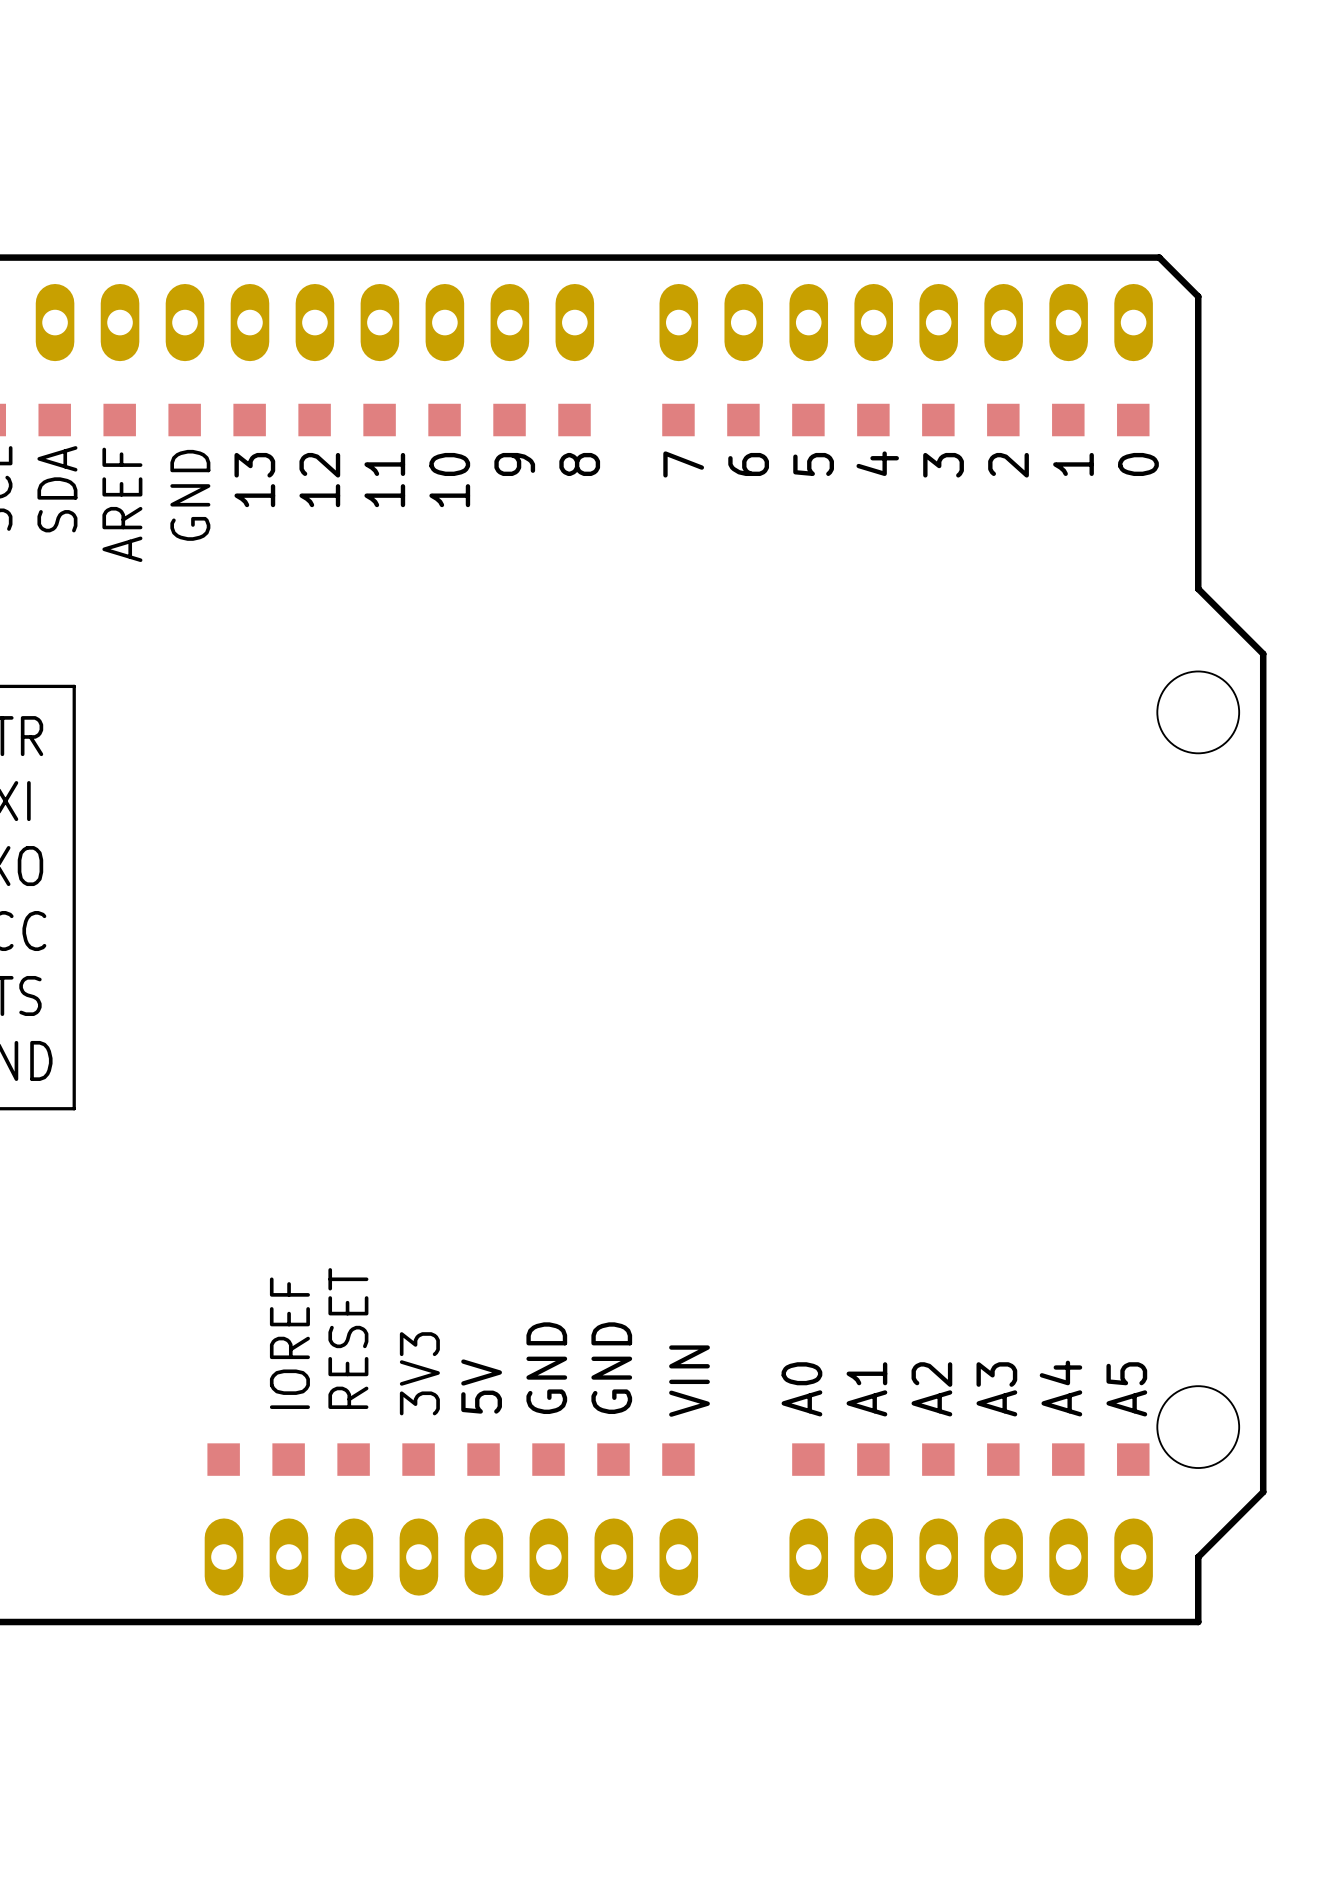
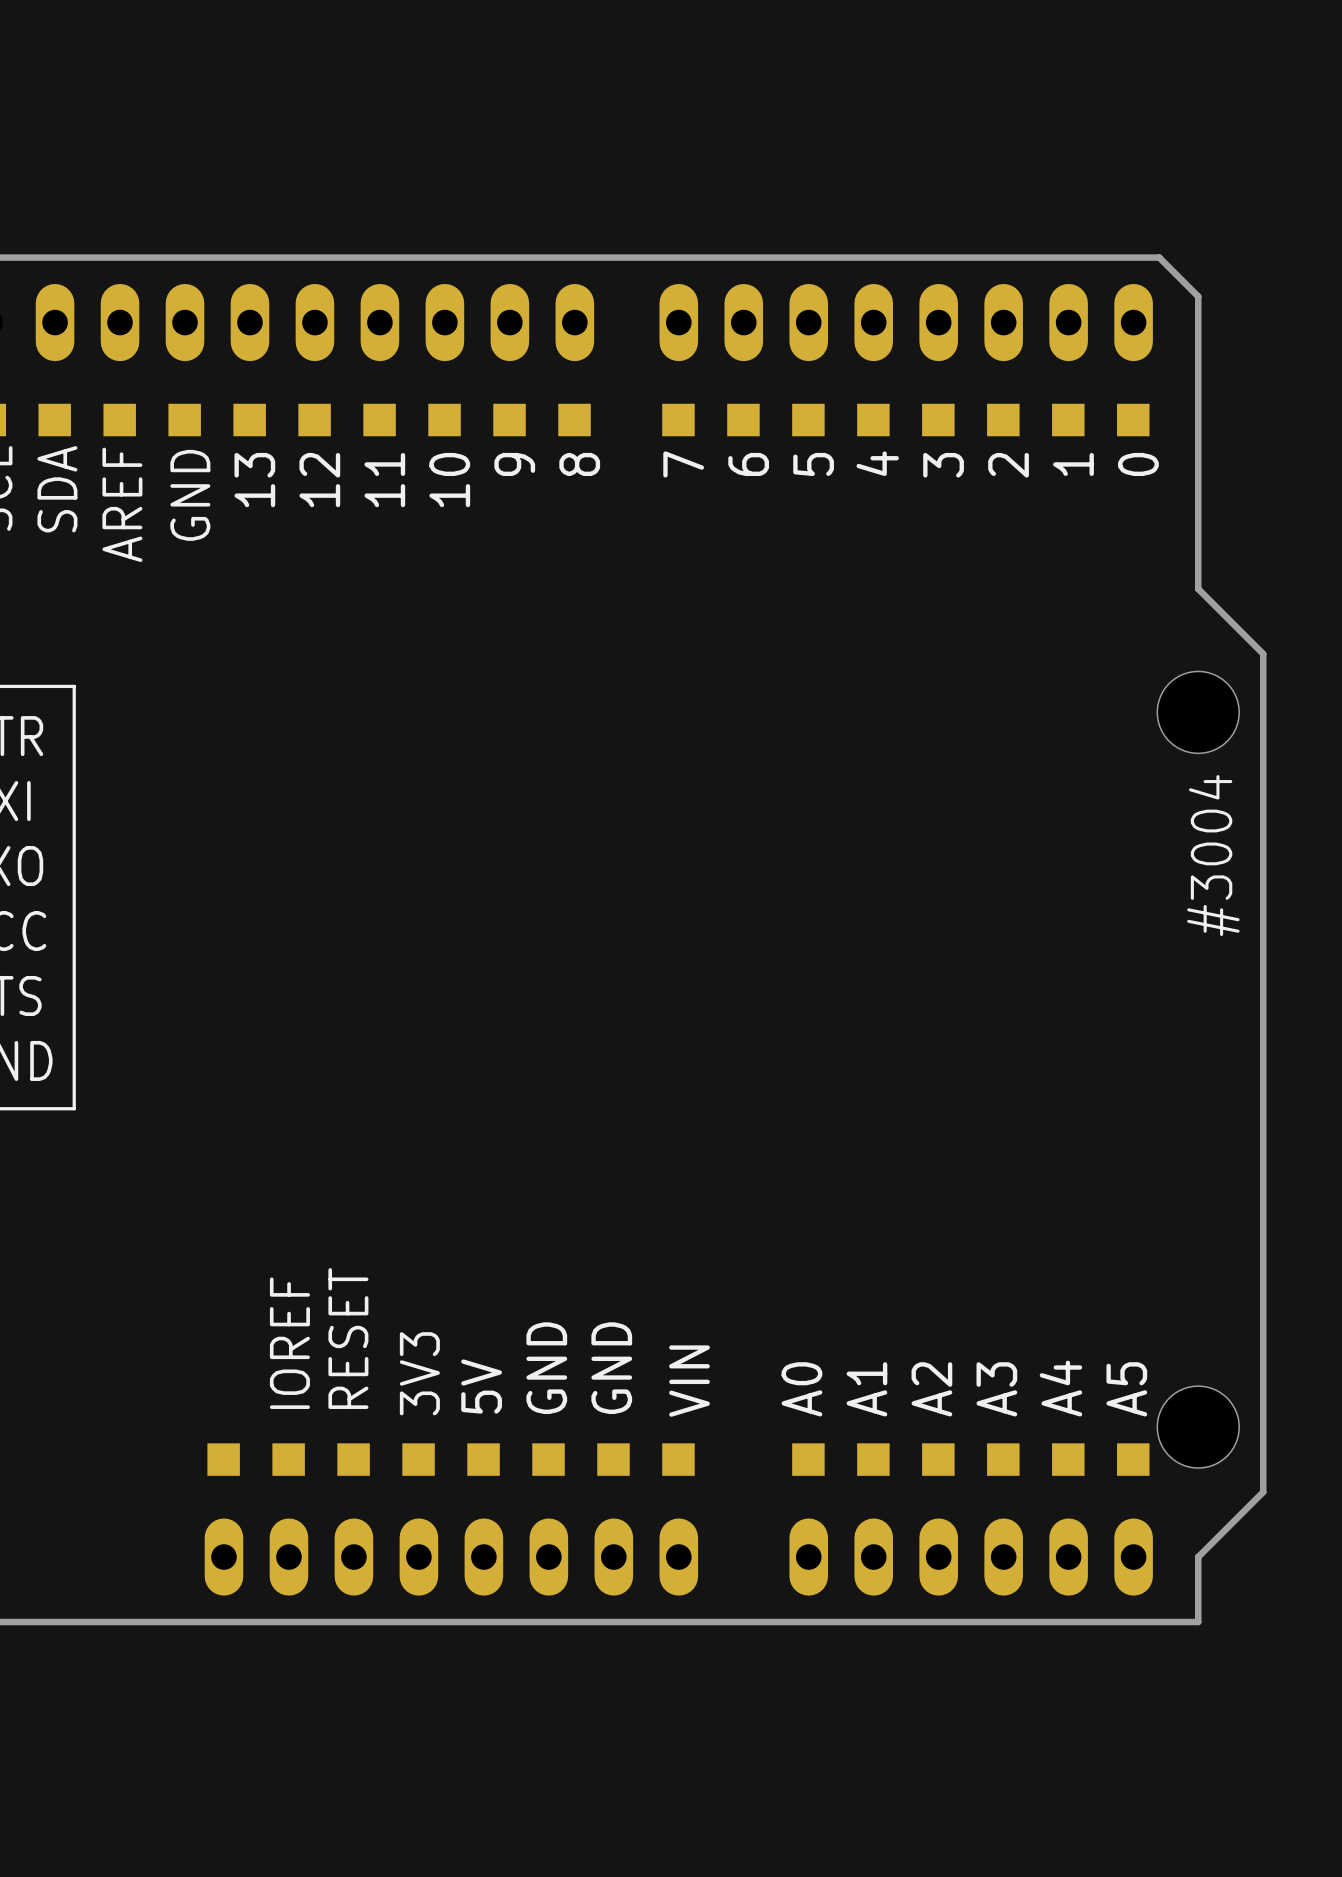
text: none -> #3004 (1213, 855)

